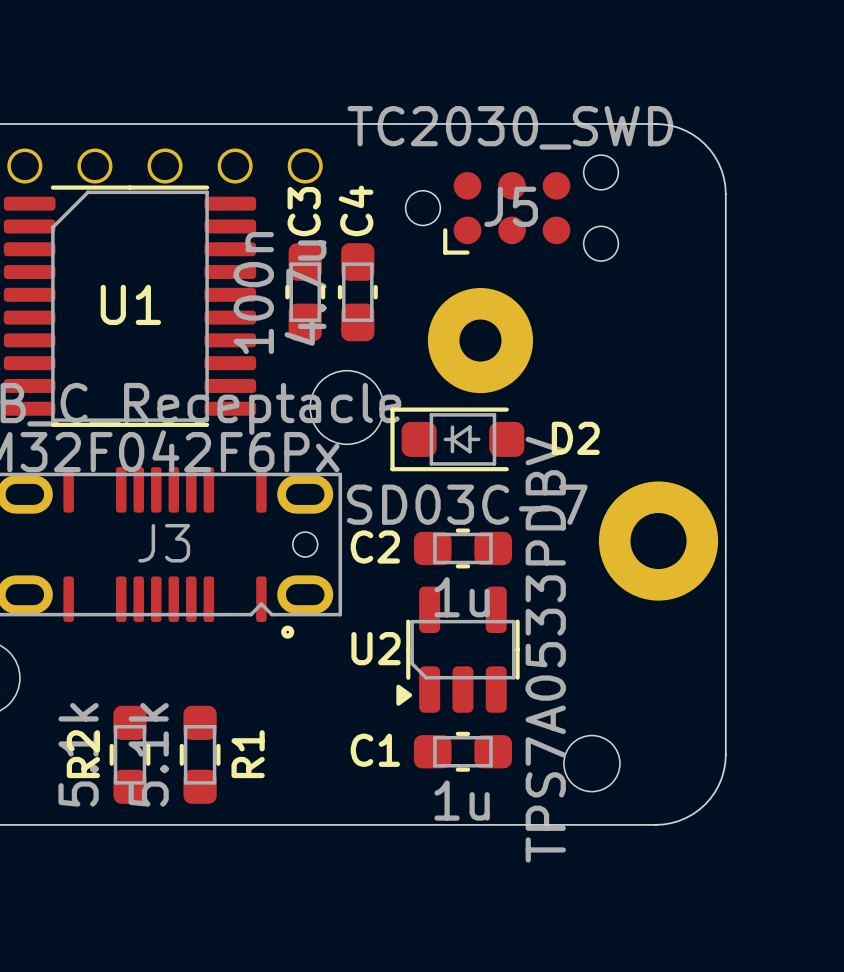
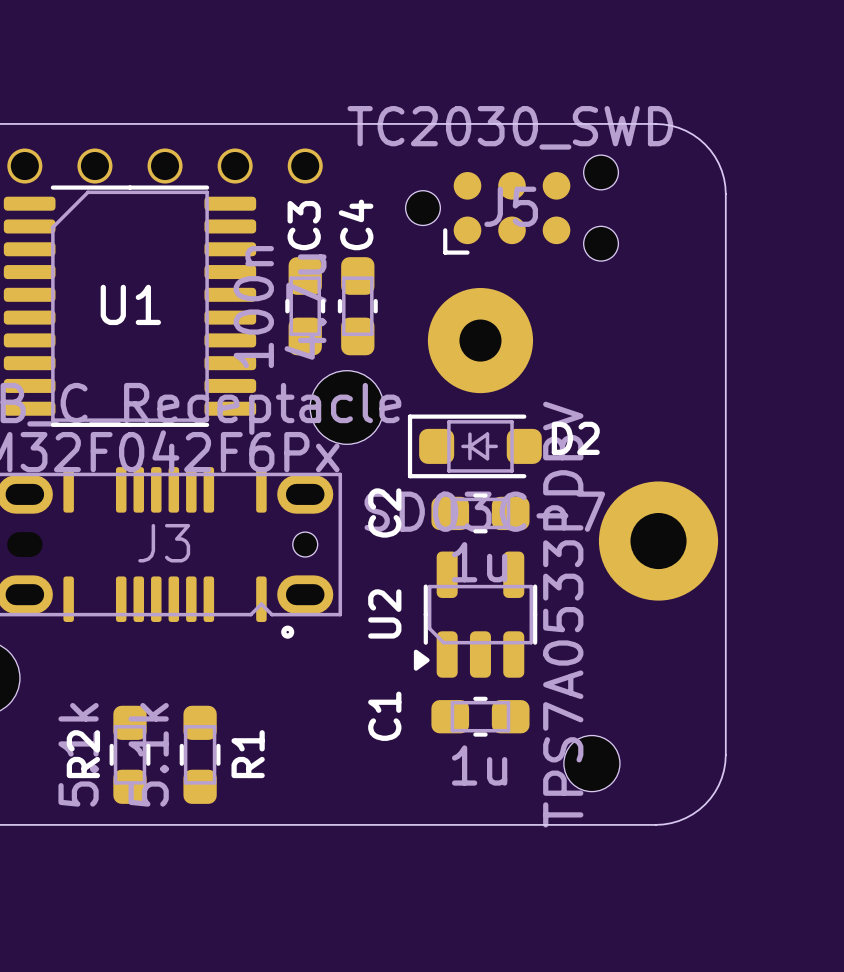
C3 position: (305, 292) -> (305, 306)
C4 position: (357, 292) -> (357, 306)
D2 position: (457, 439) -> (474, 446)
C2 name rotation: 0° (375, 546) -> 90° counterclockwise (384, 512)
C2 position: (462, 548) -> (480, 513)
U2 name rotation: 0° (375, 648) -> 90° counterclockwise (384, 613)
U2 position: (458, 649) -> (475, 614)
C1 name rotation: 0° (375, 750) -> 90° counterclockwise (384, 716)
C1 position: (462, 751) -> (480, 716)

